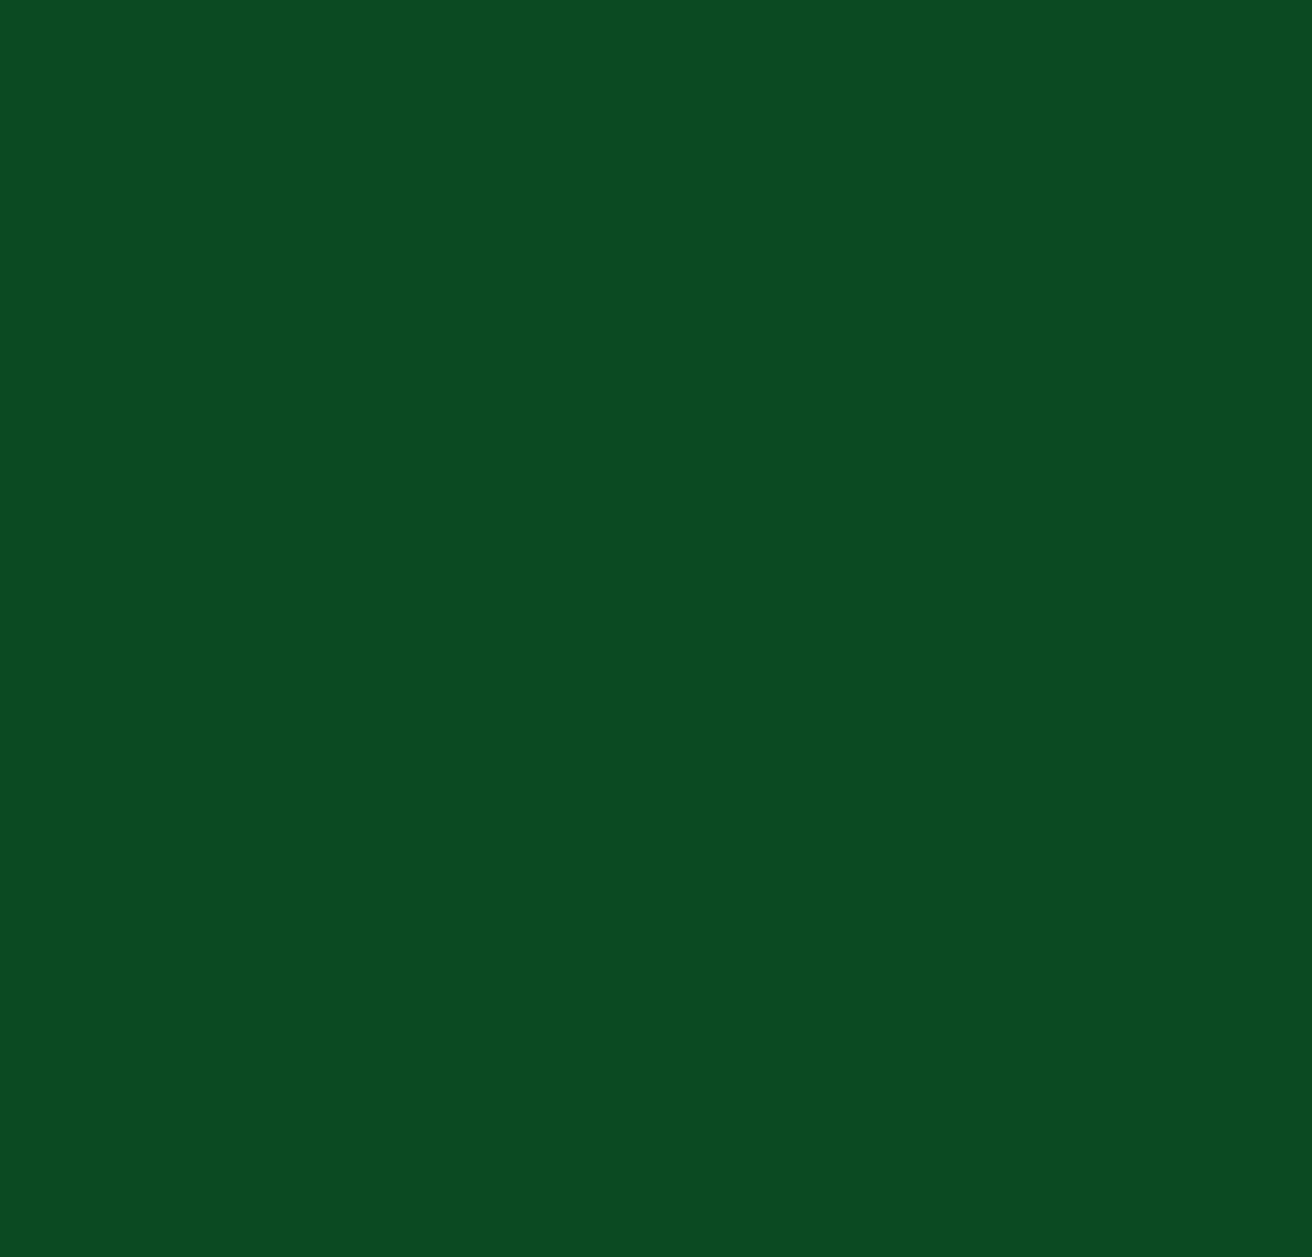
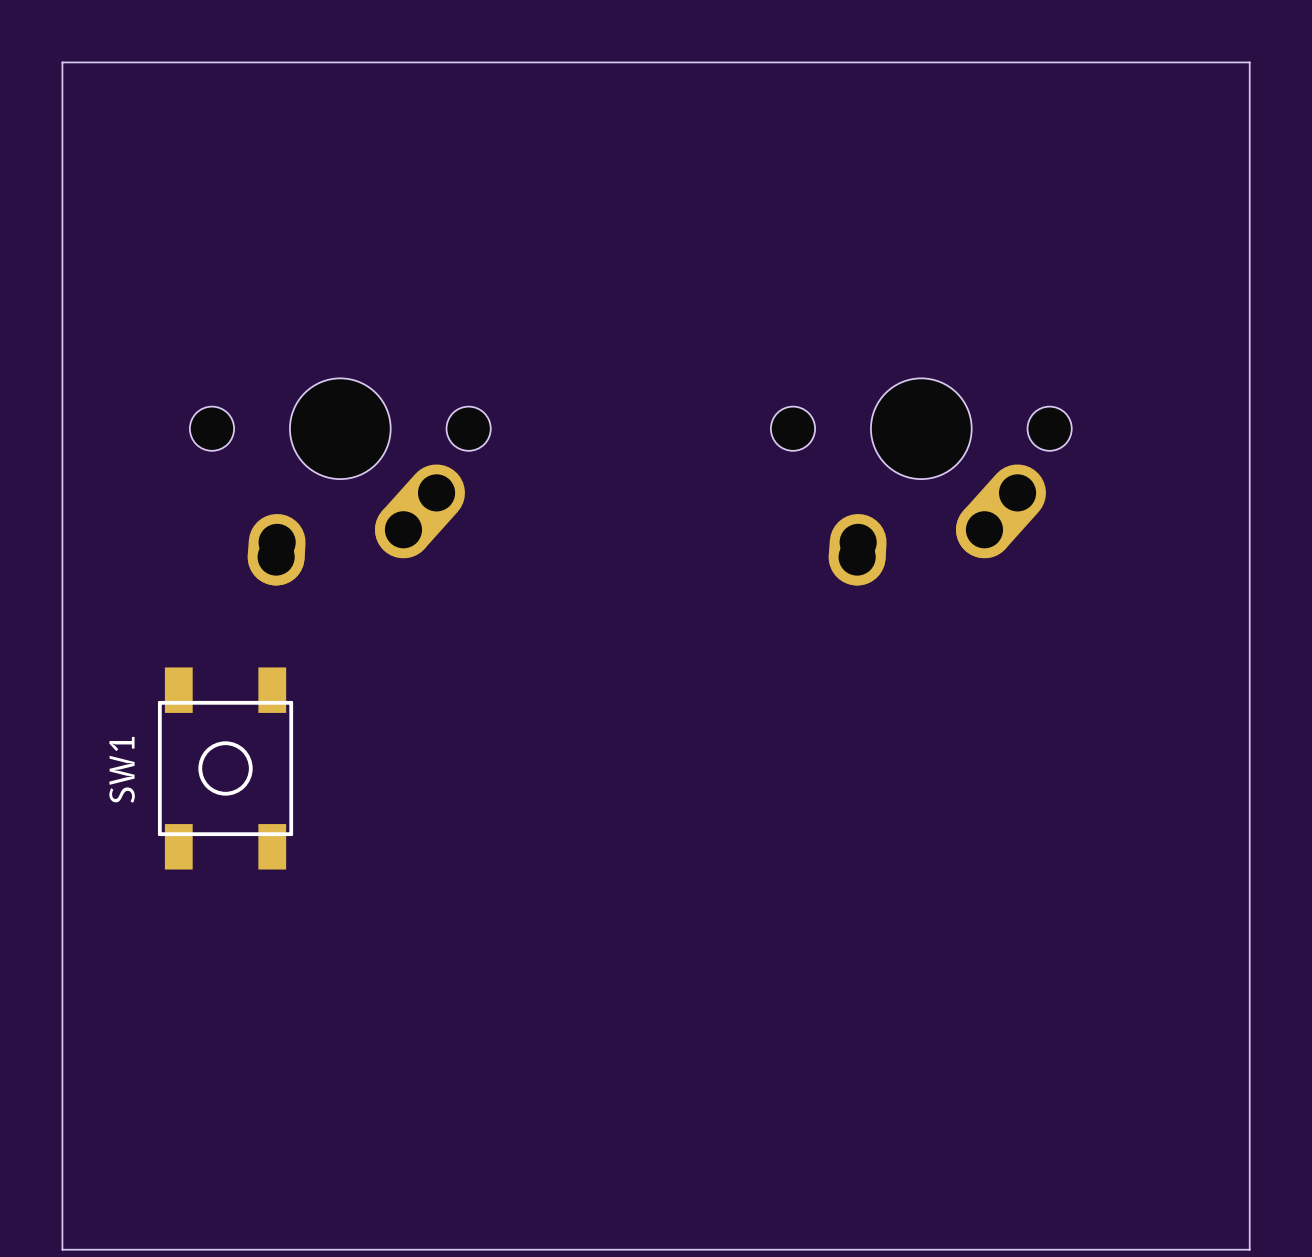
board edge: none -> (62, 62) (1249, 62) (1249, 1249) (62, 1249) (62, 62)
part: none -> (340, 481)
part: none -> (921, 481)
SW1: none -> (225, 768)

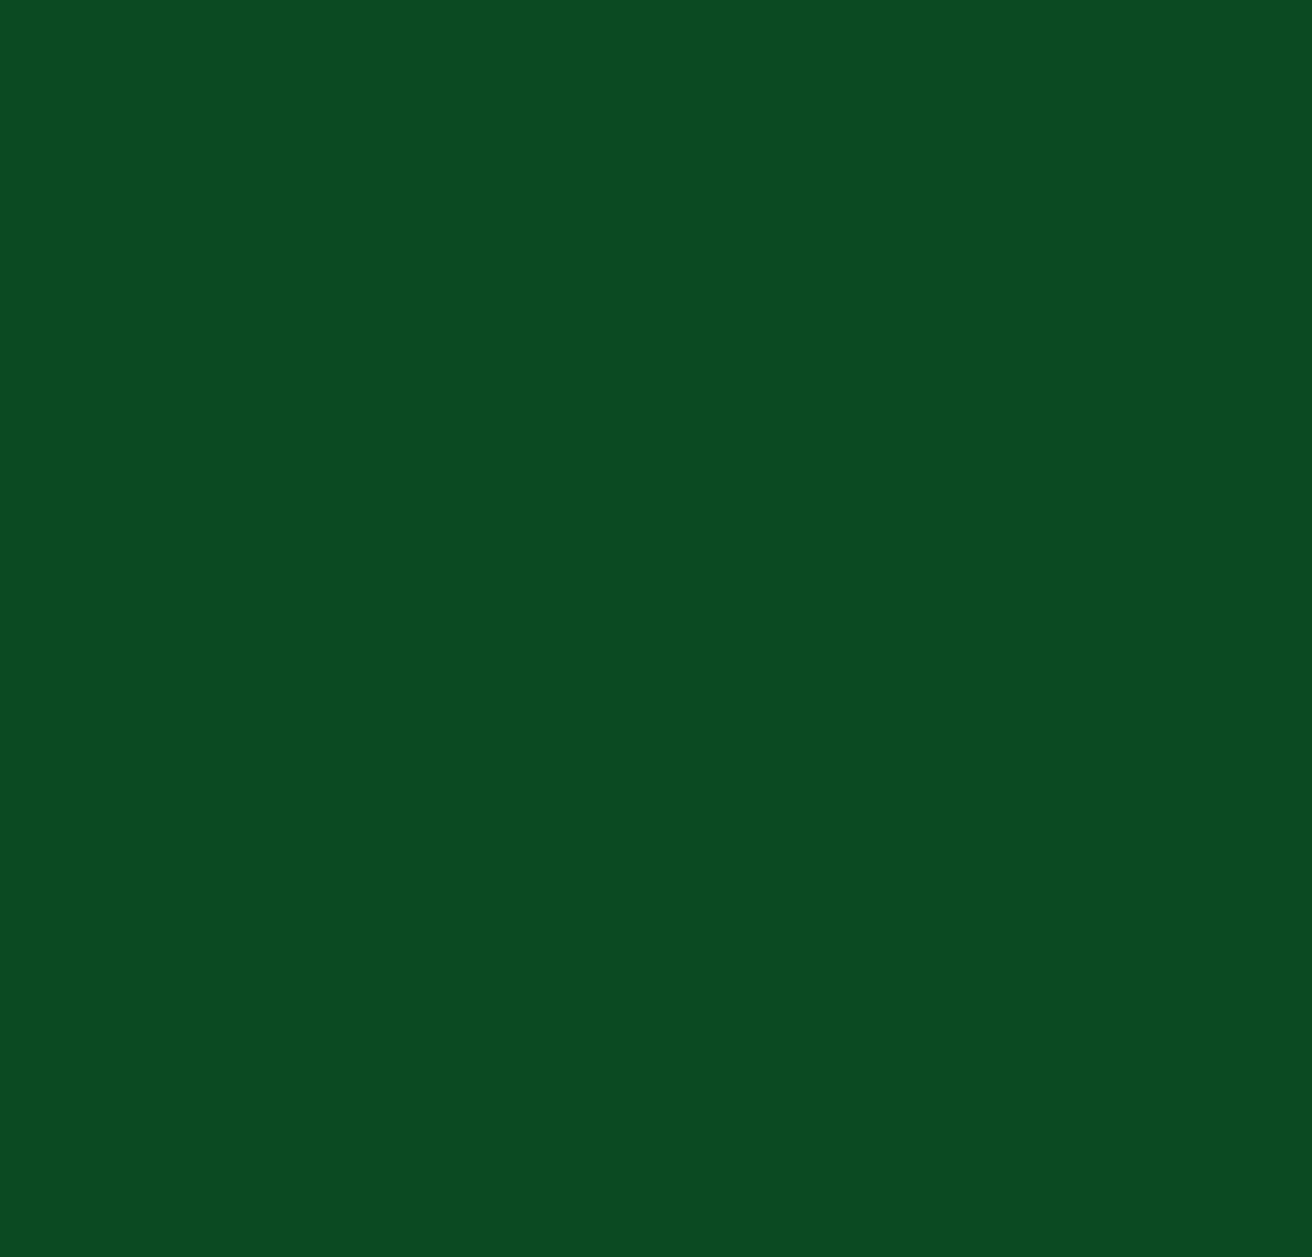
board edge: (62, 62) (1249, 62) (1249, 1249) (62, 1249) (62, 62) -> none
part: (340, 481) -> none
part: (921, 481) -> none
SW1: (225, 768) -> none

